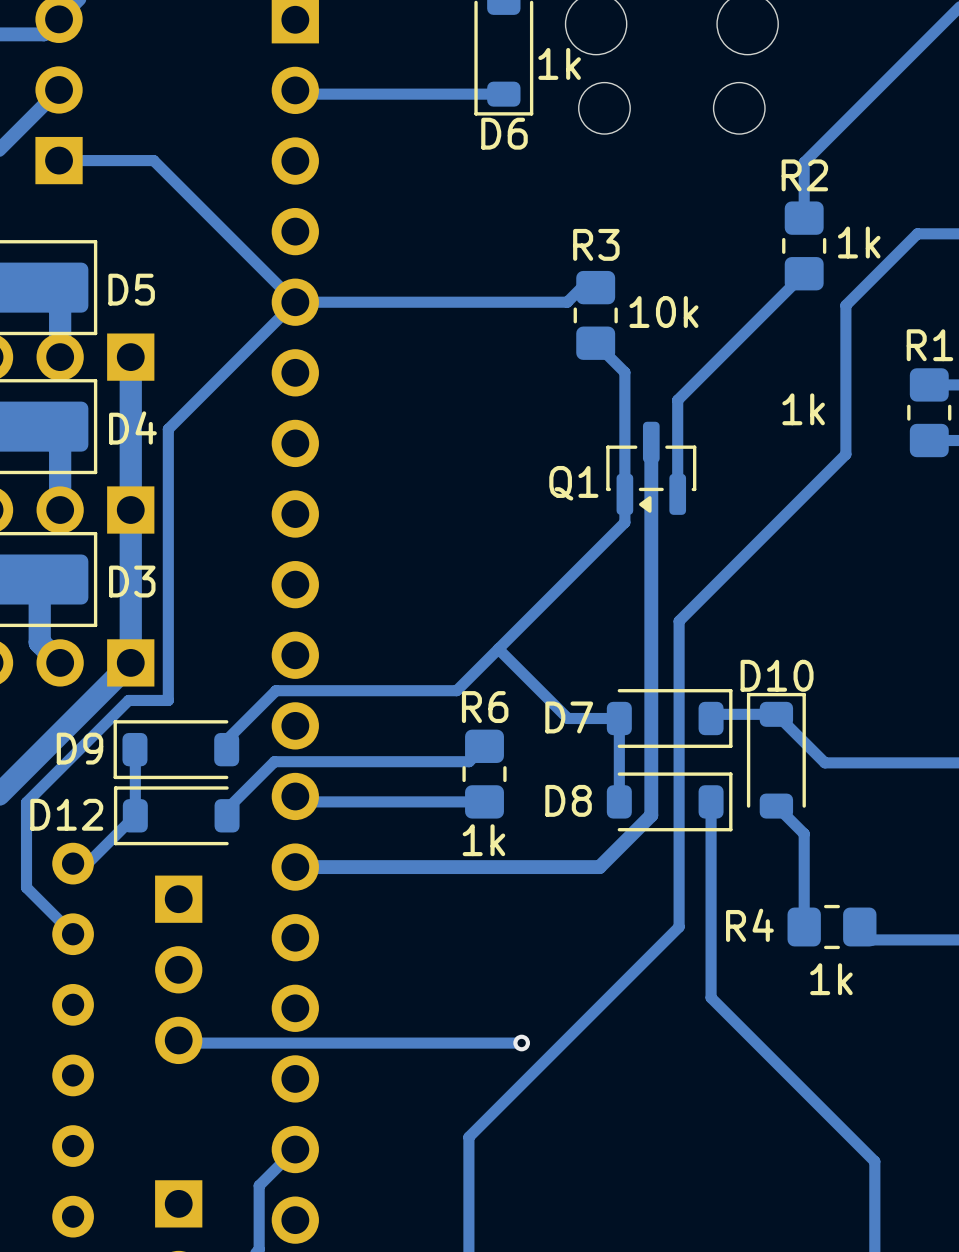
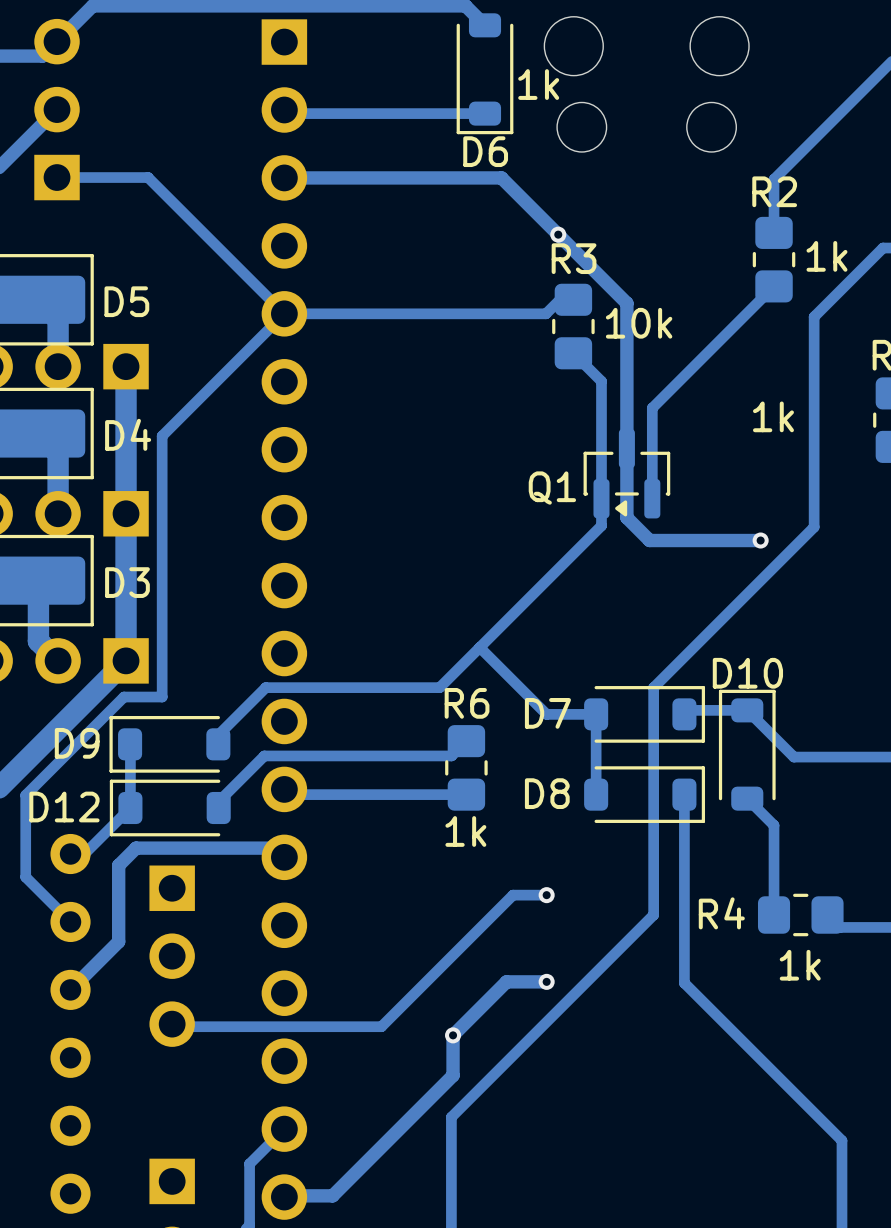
track: none -> (284, 177) (501, 177) (626, 303) (626, 448)
via: none -> (558, 234)
track: (845, 454) (679, 621) (679, 690) -> (814, 460) (814, 527) (653, 687)
track: (651, 514) (651, 815) (599, 867) (295, 867) -> (626, 517) (649, 540) (760, 540)
via: none -> (760, 540)
track: none -> (284, 857) (275, 848) (136, 848) (118, 865) (118, 941) (70, 989)
via: none -> (546, 895)
track: none -> (546, 981) (506, 981) (453, 1035) (453, 1075) (332, 1195) (284, 1197)
via: none -> (546, 981)
track: (521, 1043) (396, 1043) -> (546, 895) (513, 895) (381, 1026)
via: (521, 1043) -> none
via: none -> (453, 1035)

